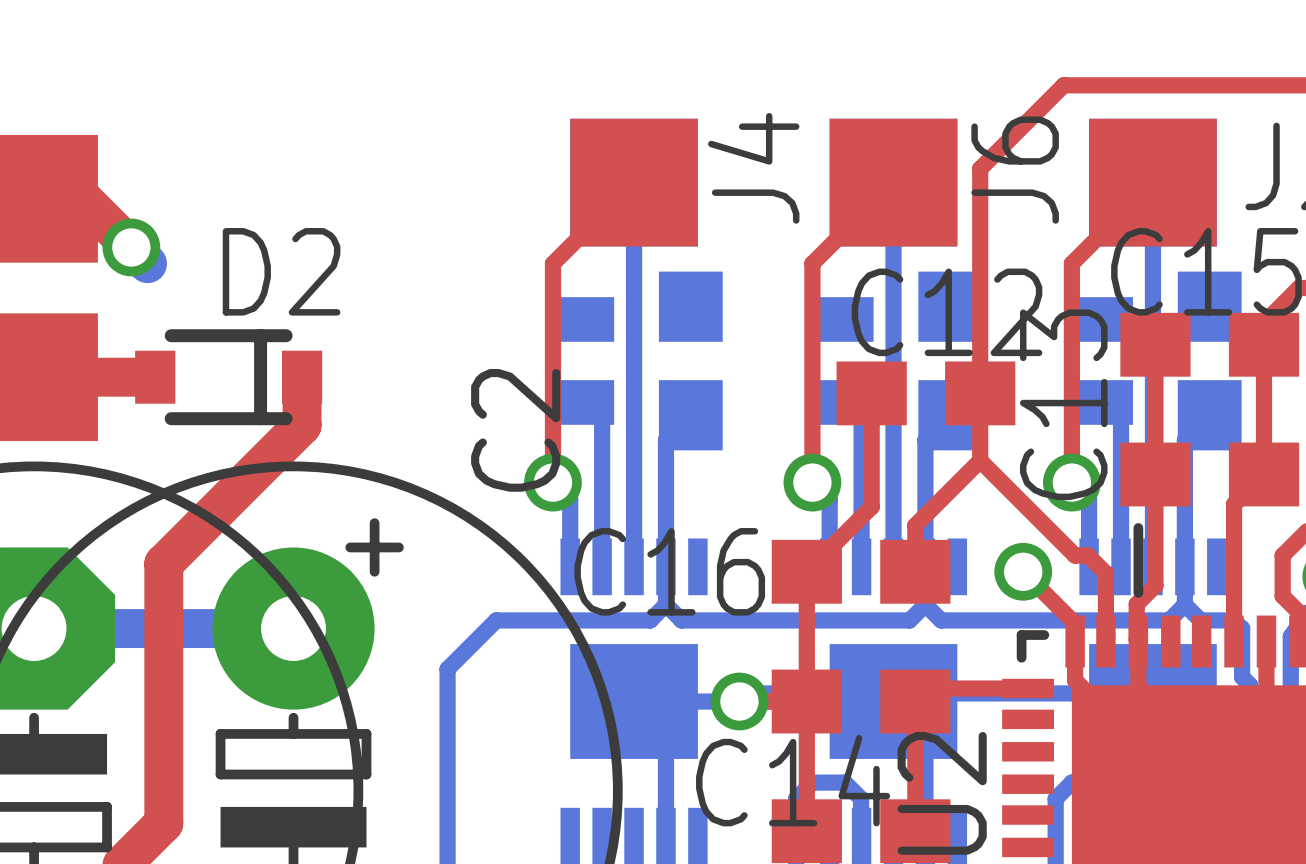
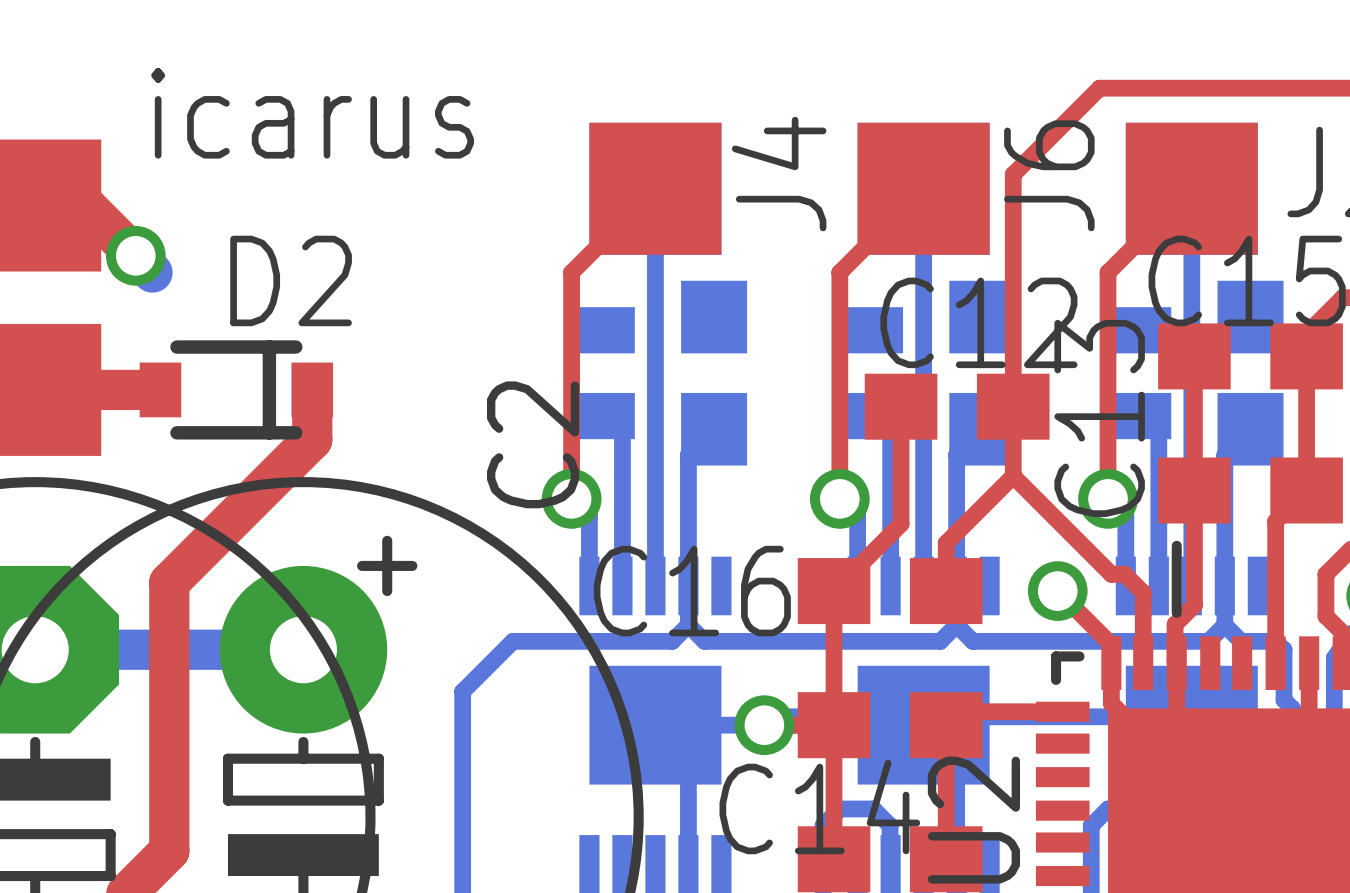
text: none -> icarus (312, 113)

